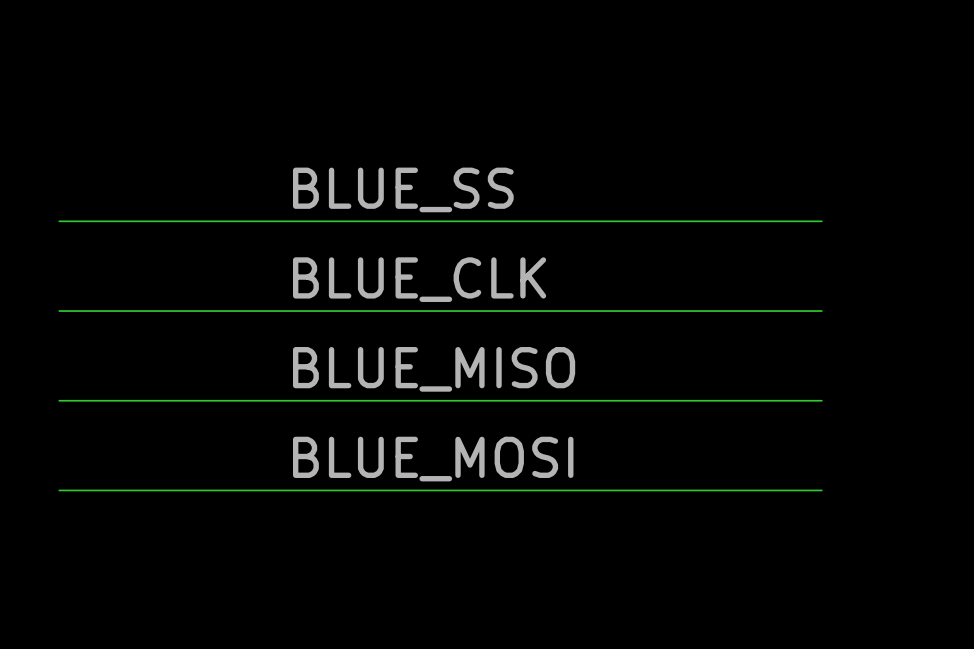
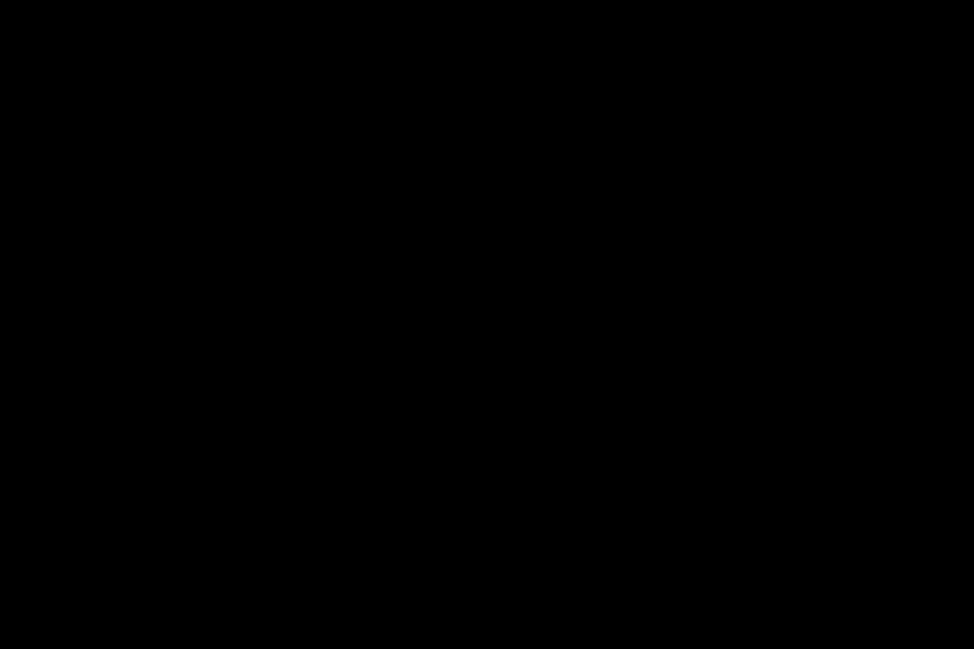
label: BLUE_SS (403, 189) -> none
wire: (59, 221) (821, 221) -> none
label: BLUE_CLK (419, 279) -> none
wire: (59, 311) (821, 311) -> none
label: BLUE_MISO (434, 369) -> none
wire: (59, 400) (821, 400) -> none
label: BLUE_MOSI (433, 459) -> none
wire: (59, 490) (821, 490) -> none

